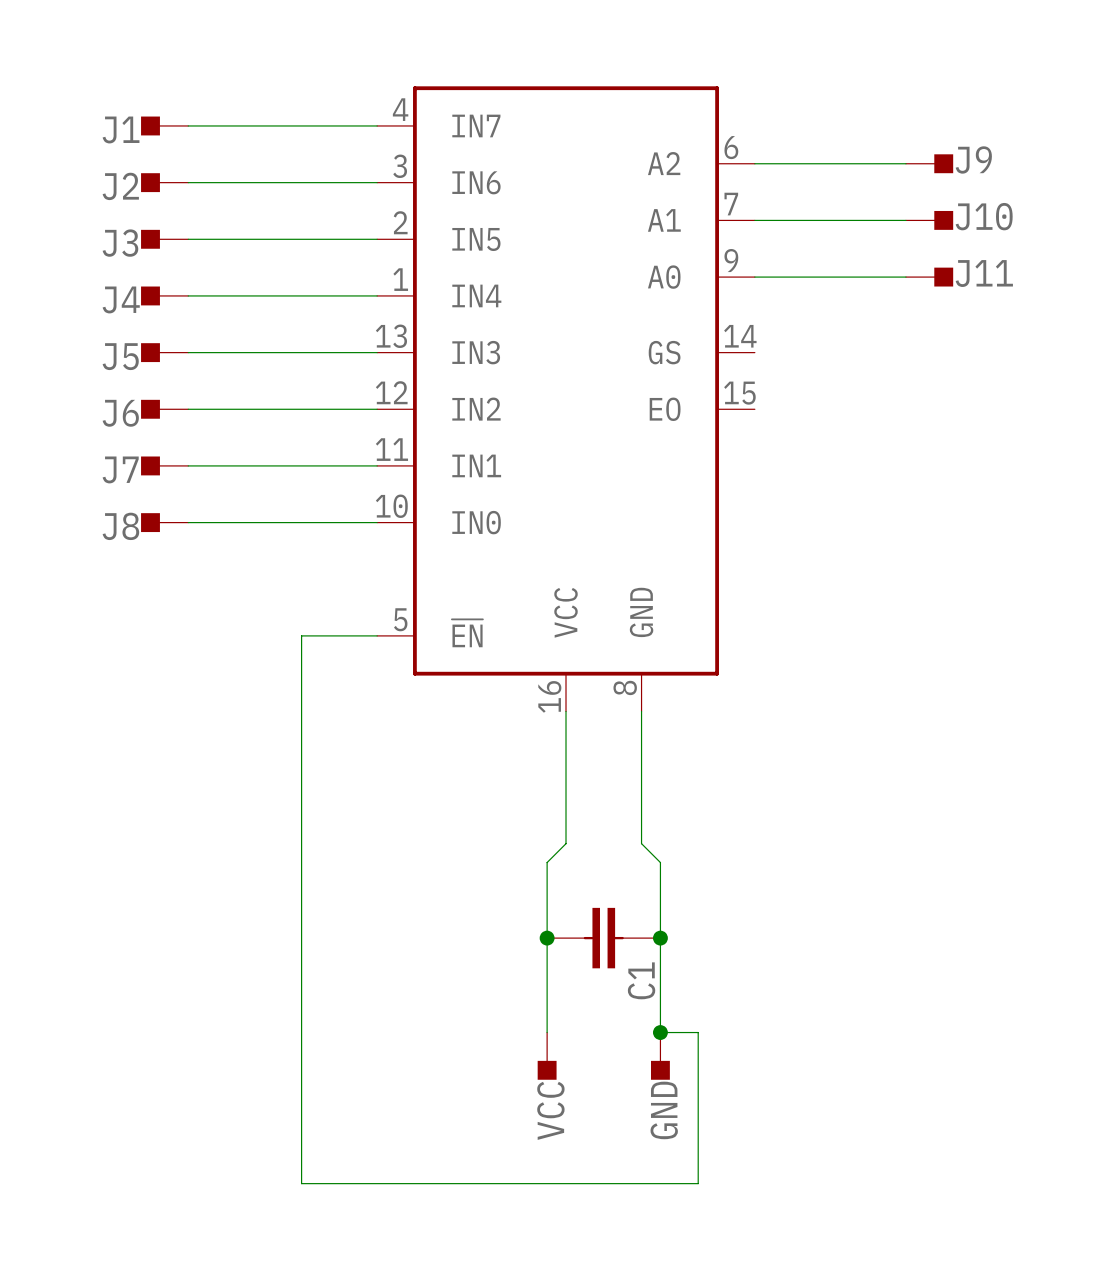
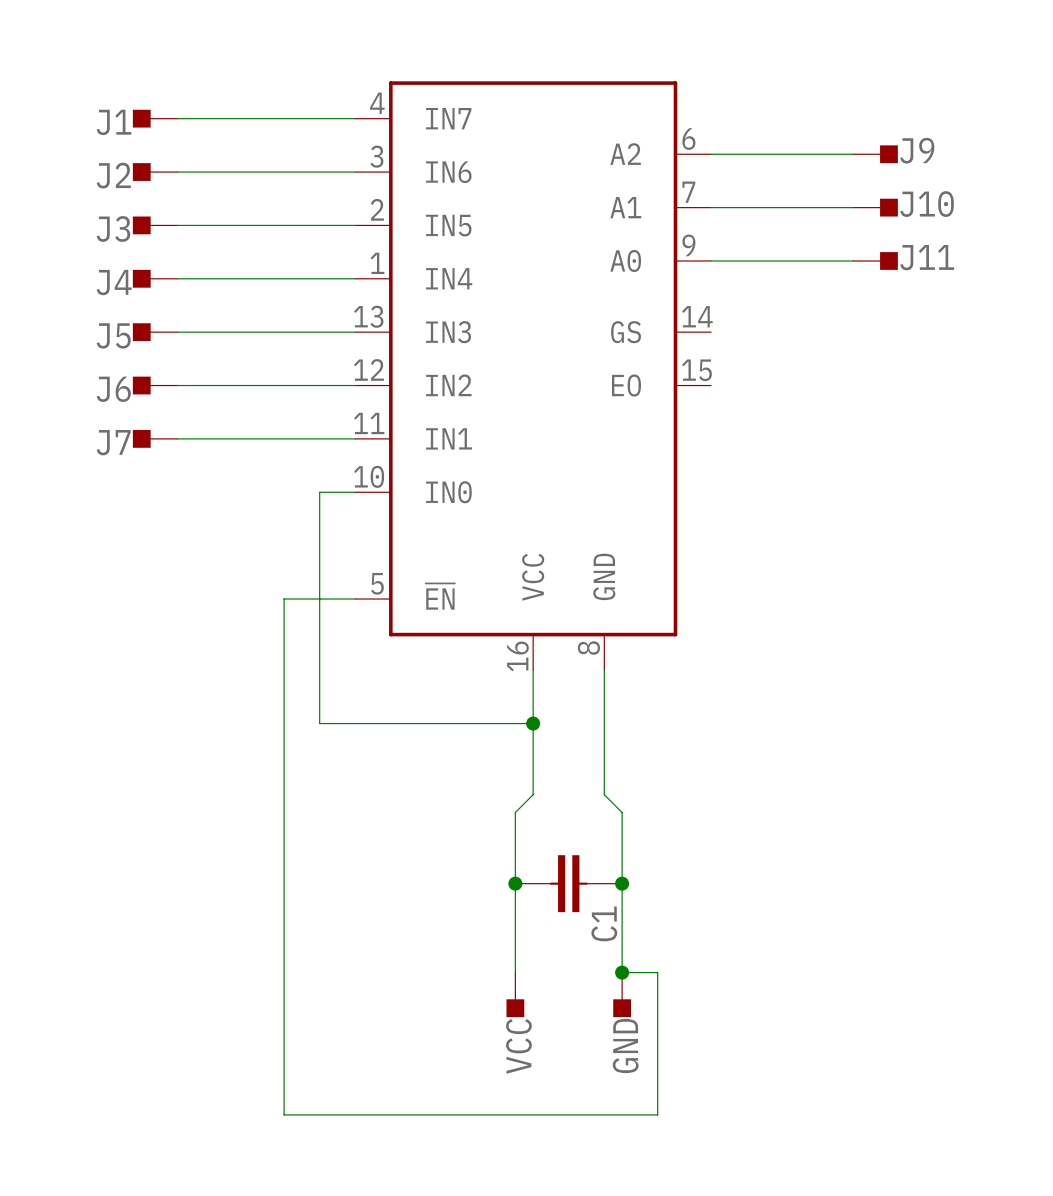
J8: (164, 522) -> none
wire: (188, 522) (339, 522) -> (533, 723) (319, 723) (319, 492)
junction: none -> (533, 723)

